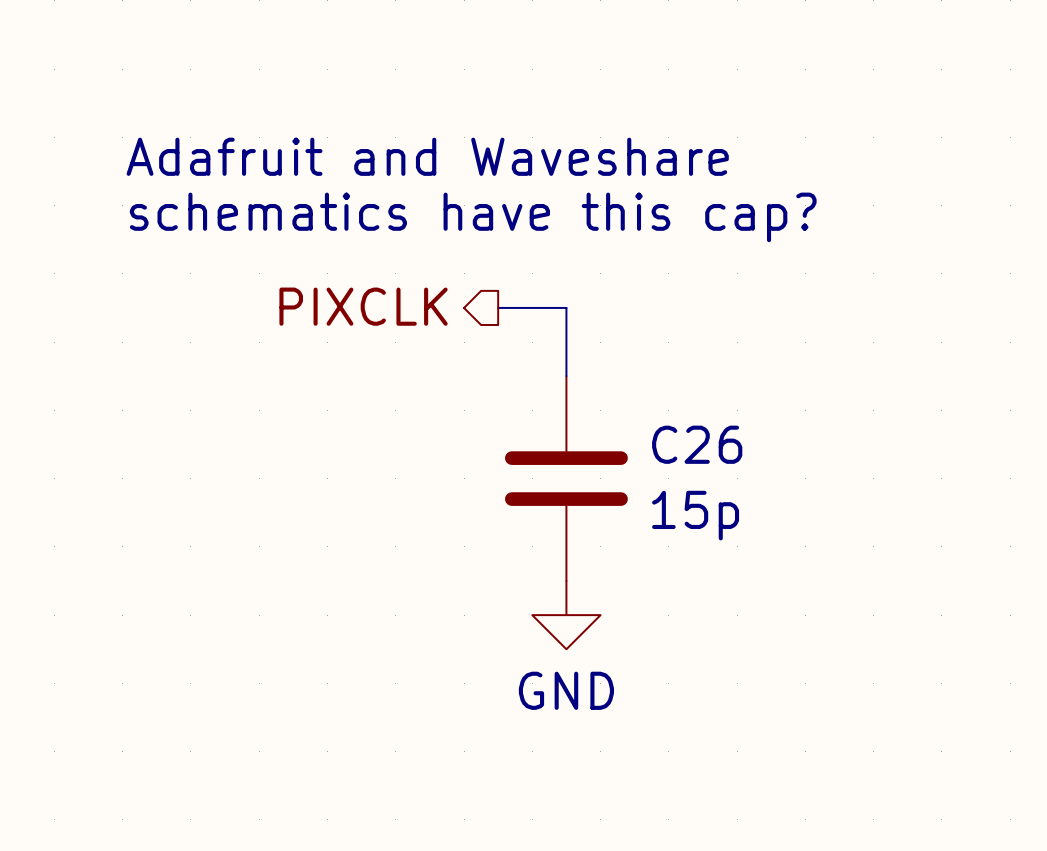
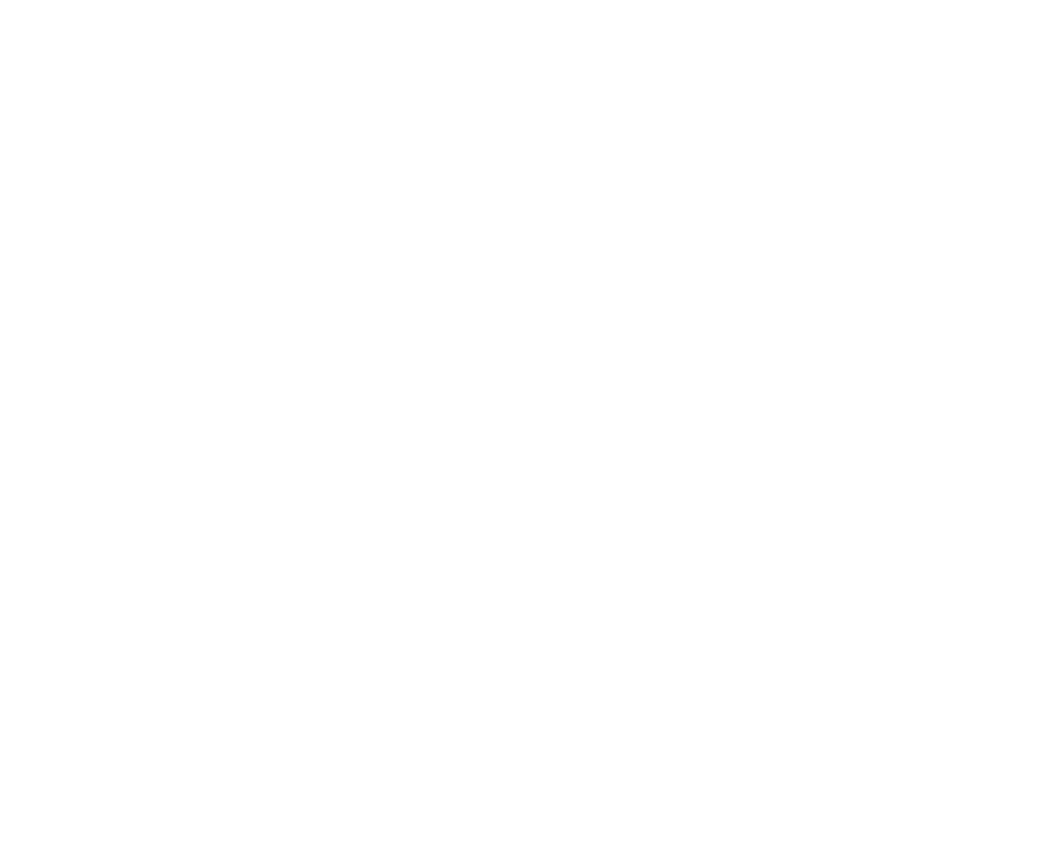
text: Adafruit and Waveshare (427, 156) -> none
text: schematics have this cap? (473, 217) -> none
hierarchical label: PIXCLK (363, 306) -> none
wire: (498, 307) (566, 307) (566, 376) -> none
C26: 15p (566, 478) -> none
power symbol: GND (566, 615) -> none

